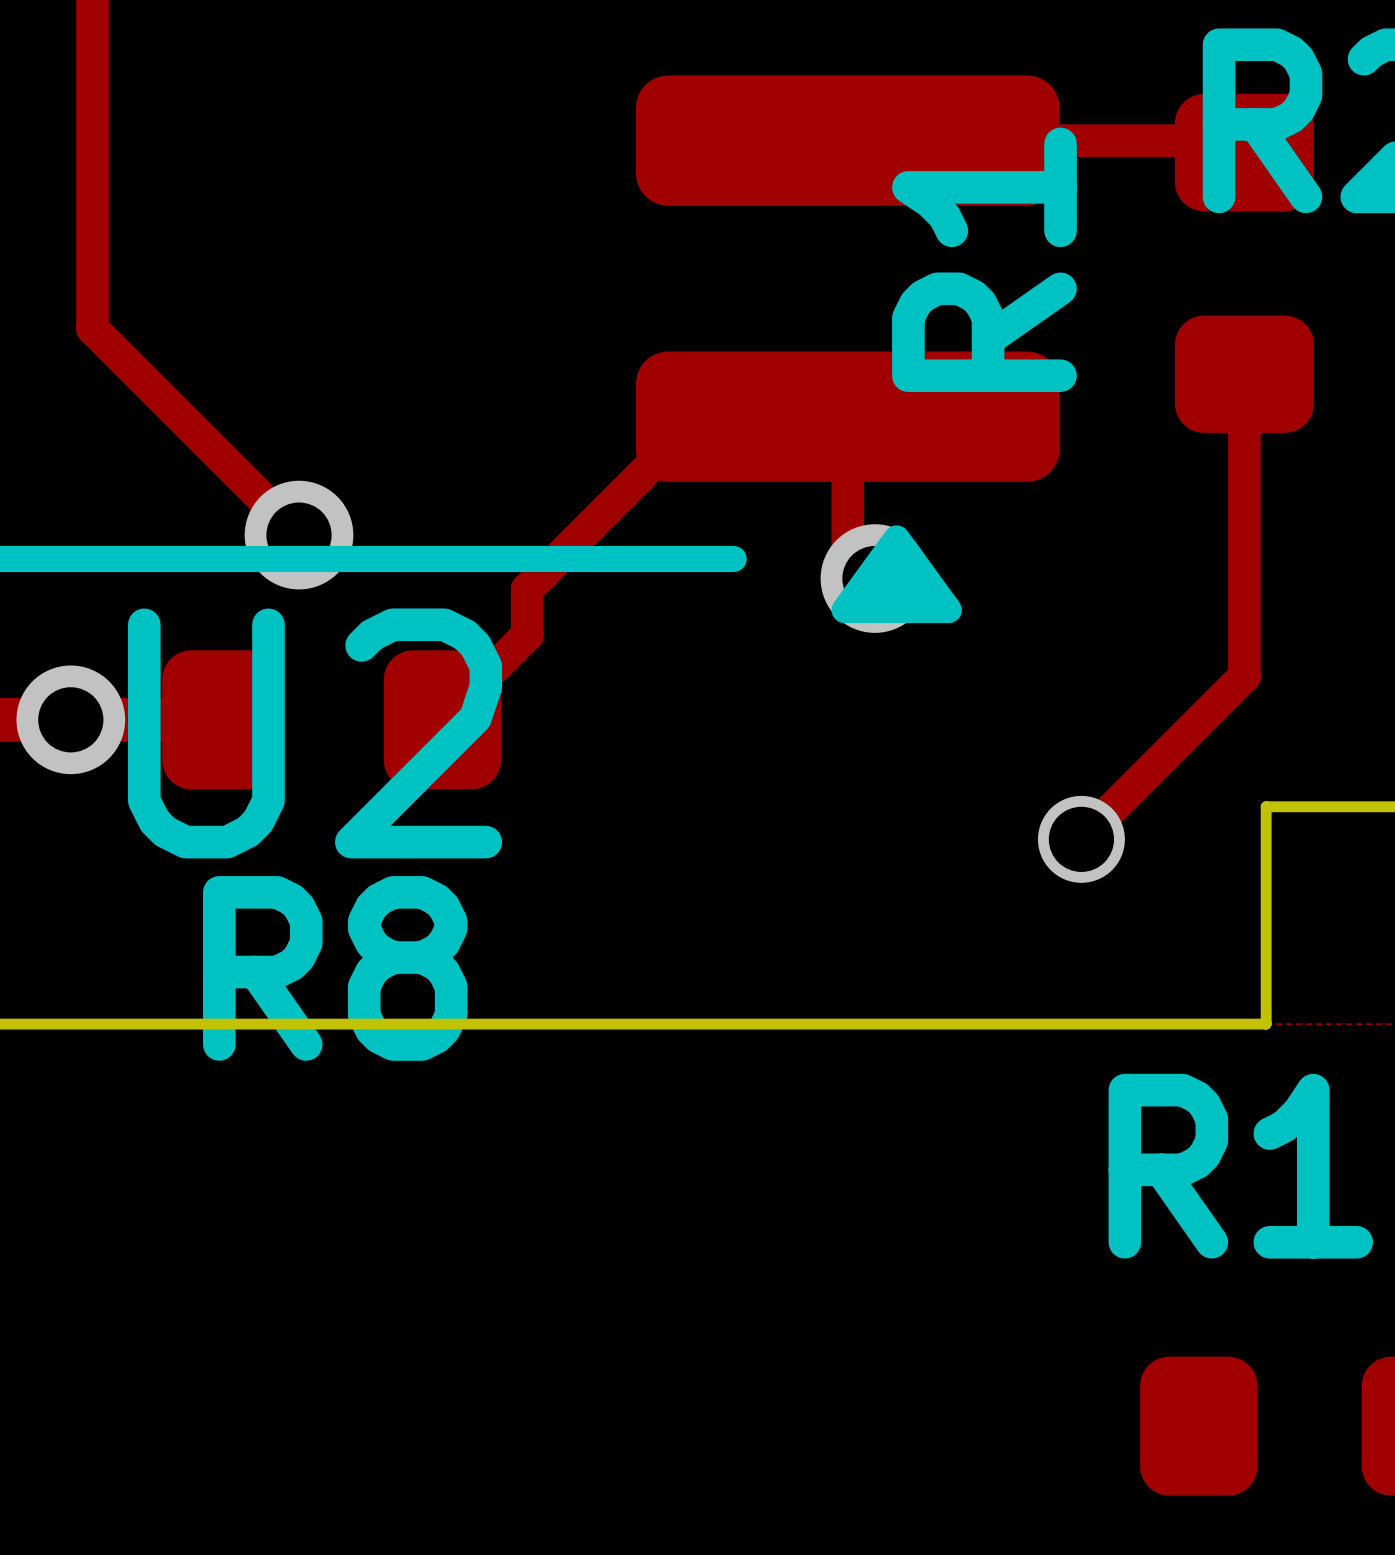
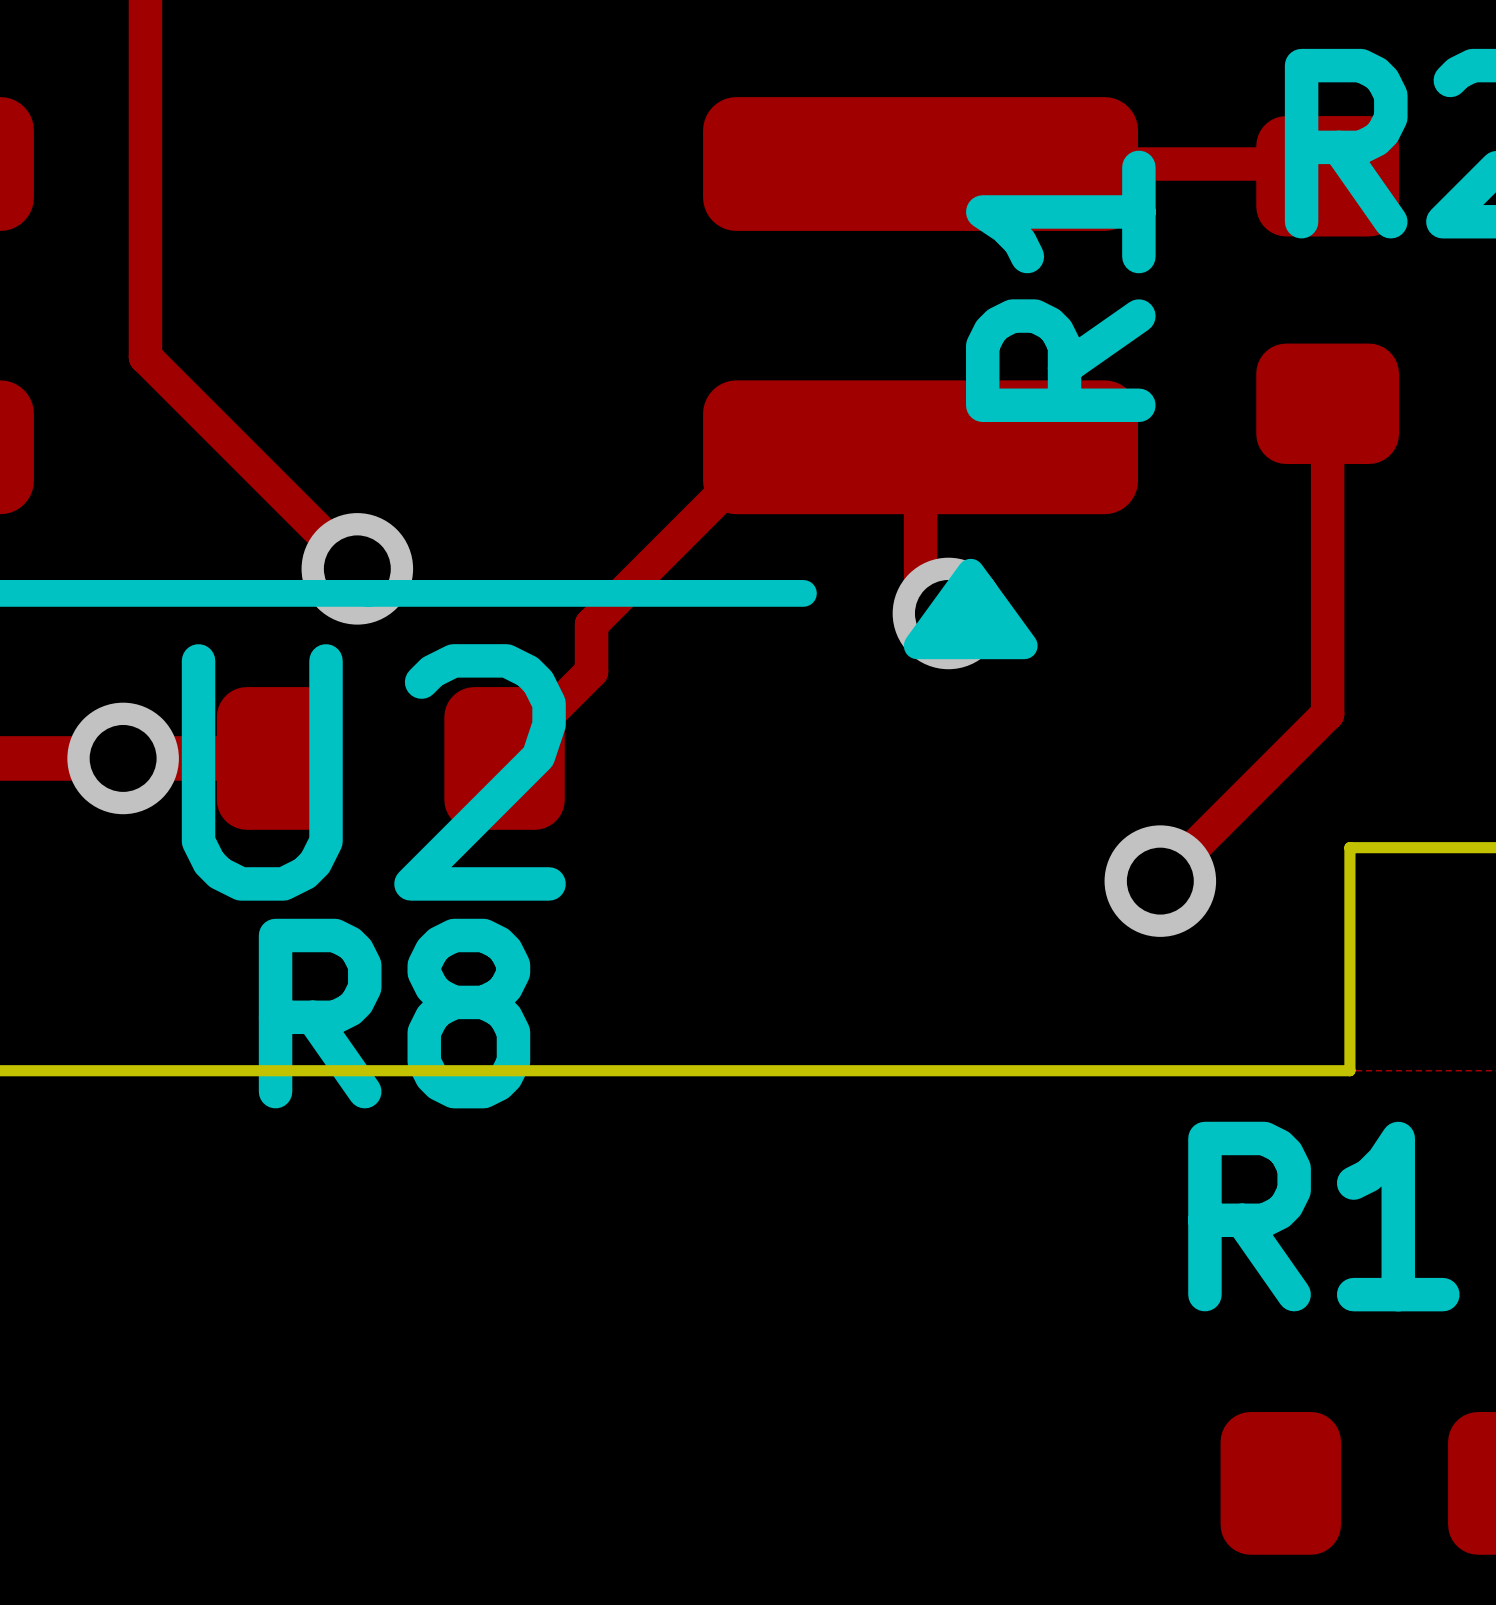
via size: [1037, 795, 1125, 883] -> [1104, 825, 1217, 937]

